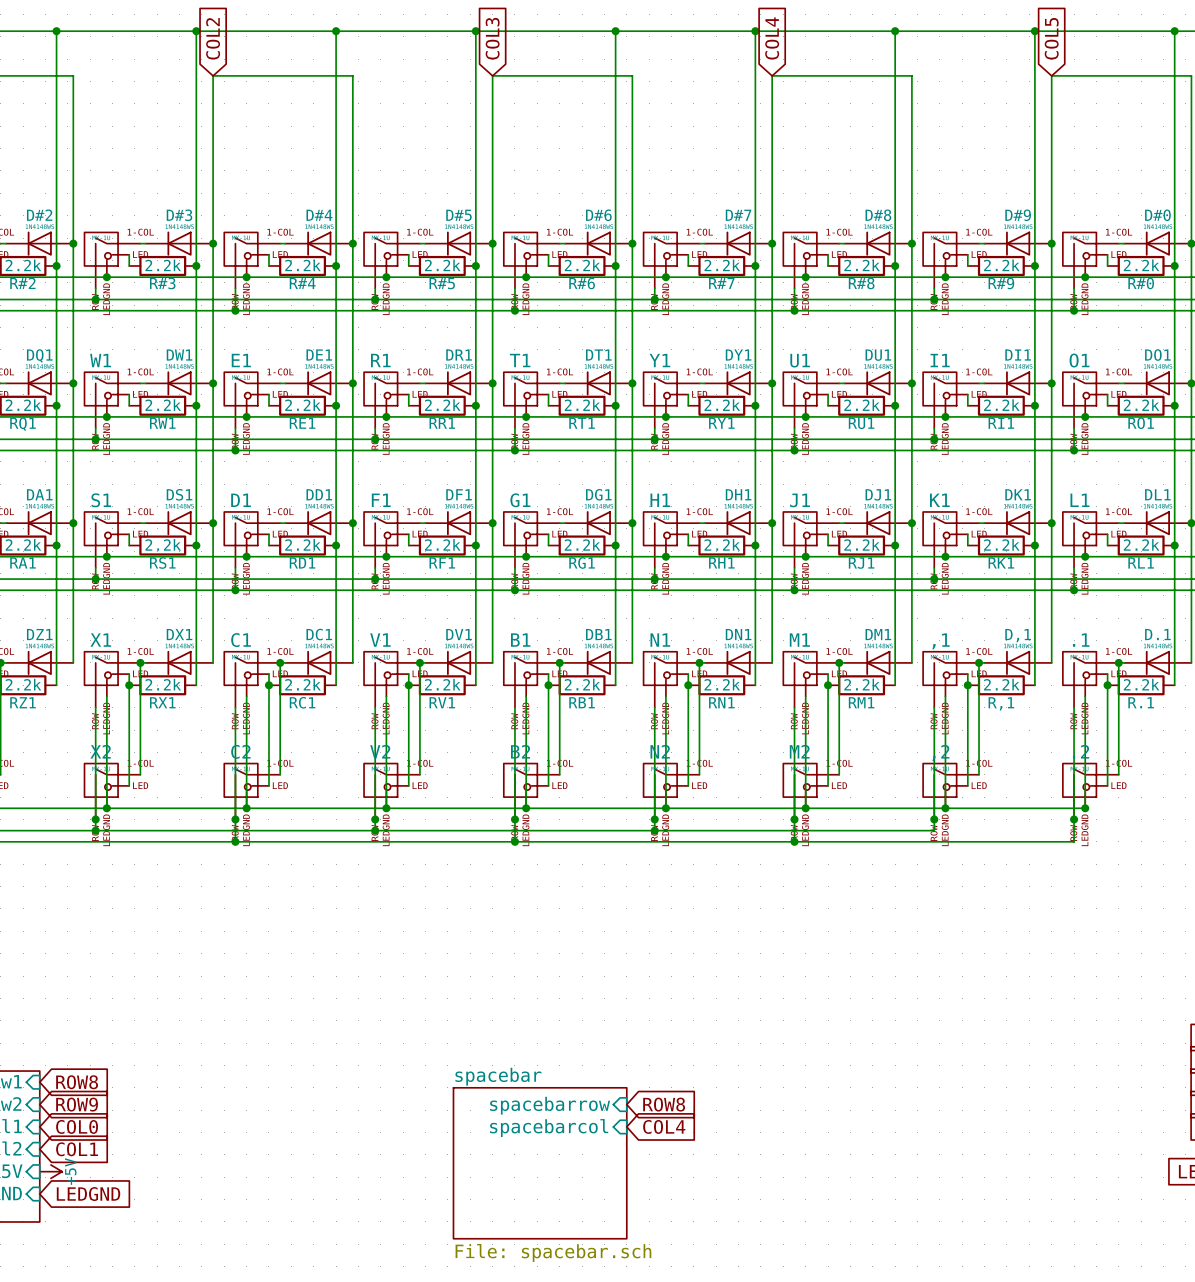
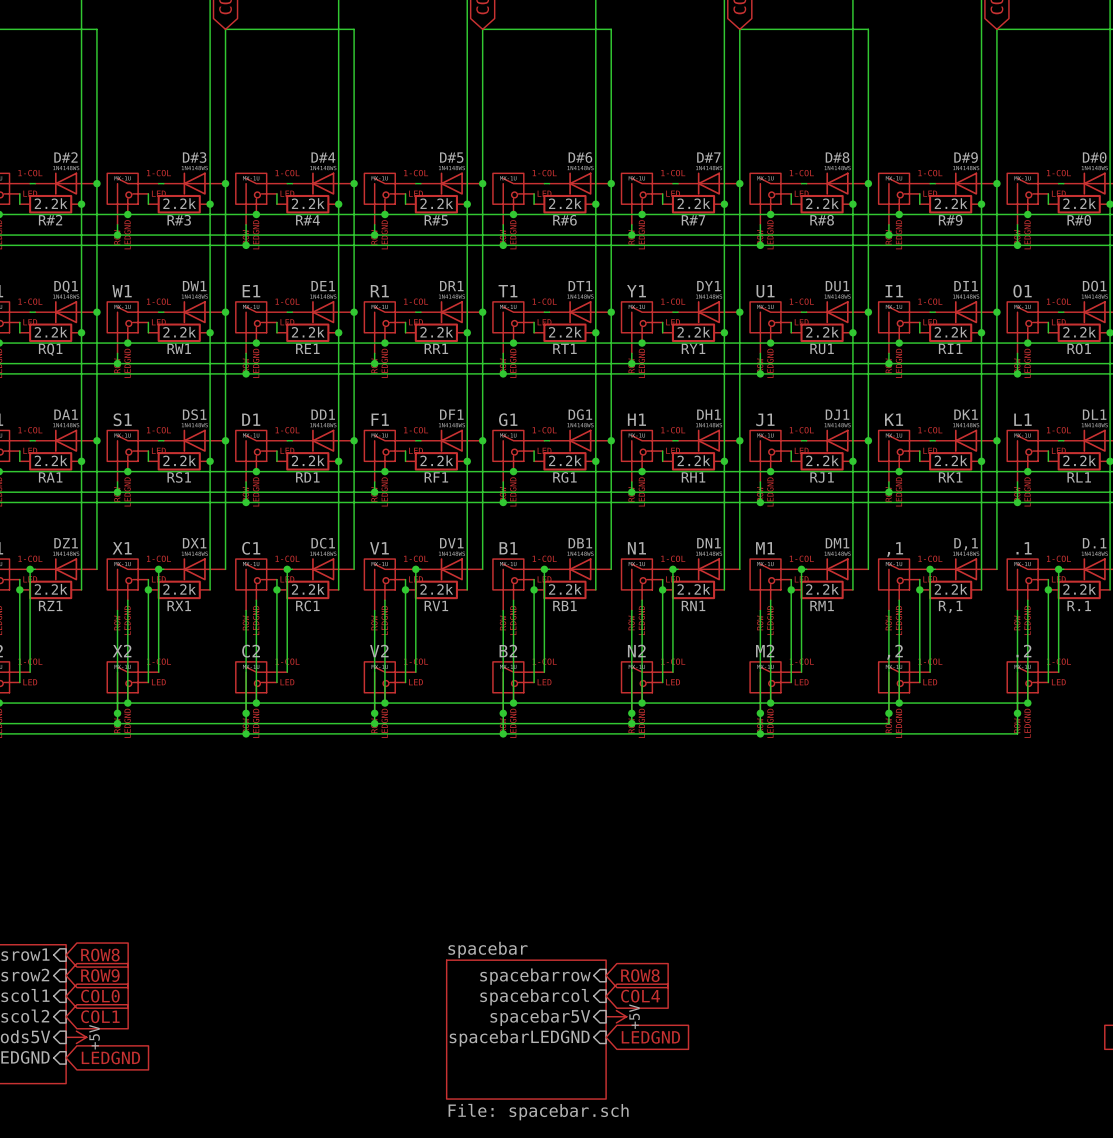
power symbol: none -> +5V (616, 1016)
sheet pin: none -> spacebar5V (540, 1017)
global label: none -> LEDGND (650, 1037)
sheet pin: none -> spacebarLEDGND (519, 1038)

